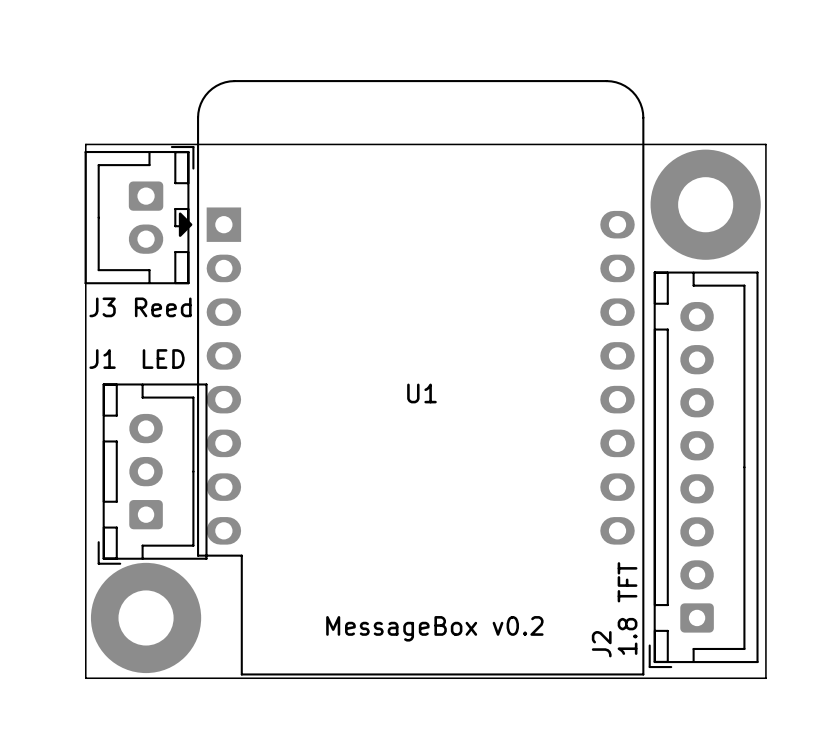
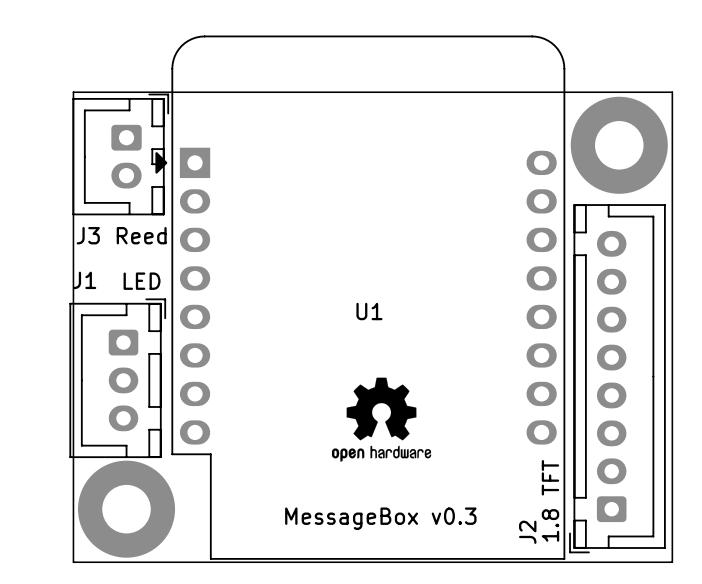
drawing: none -> [331, 377, 432, 462]
J1 rotation: 0° (152, 474) -> 180° (117, 378)
text: MessageBox v0.2 (434, 628) -> MessageBox v0.3 (380, 518)

